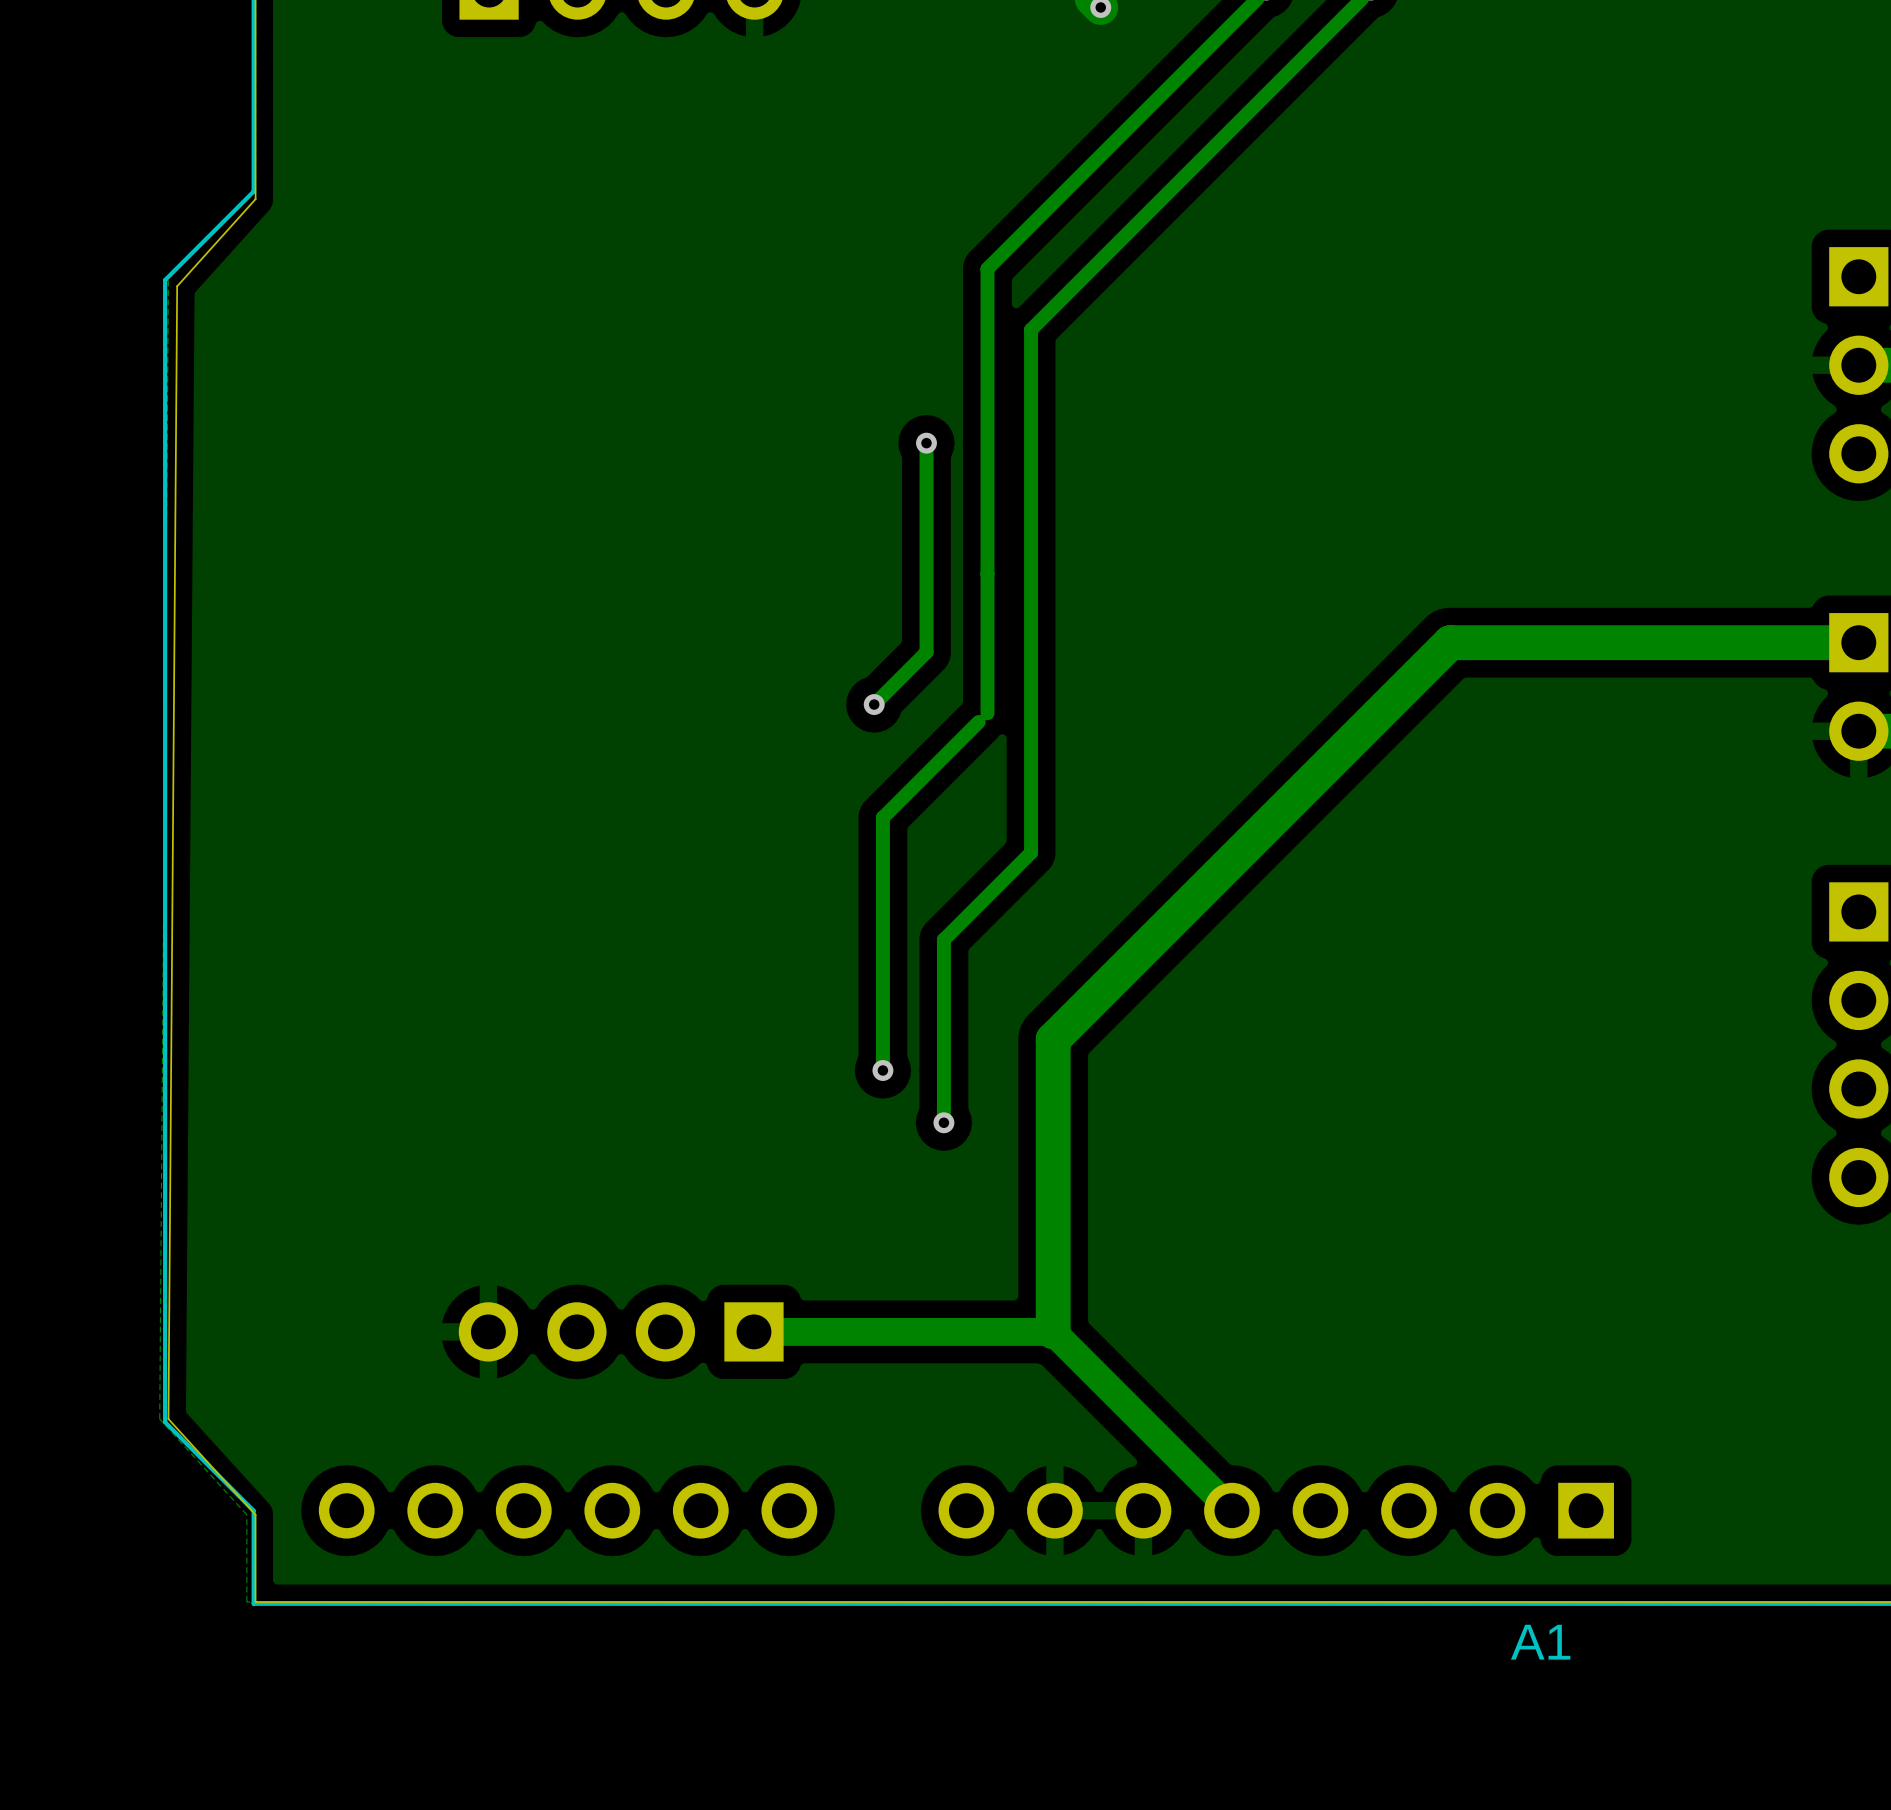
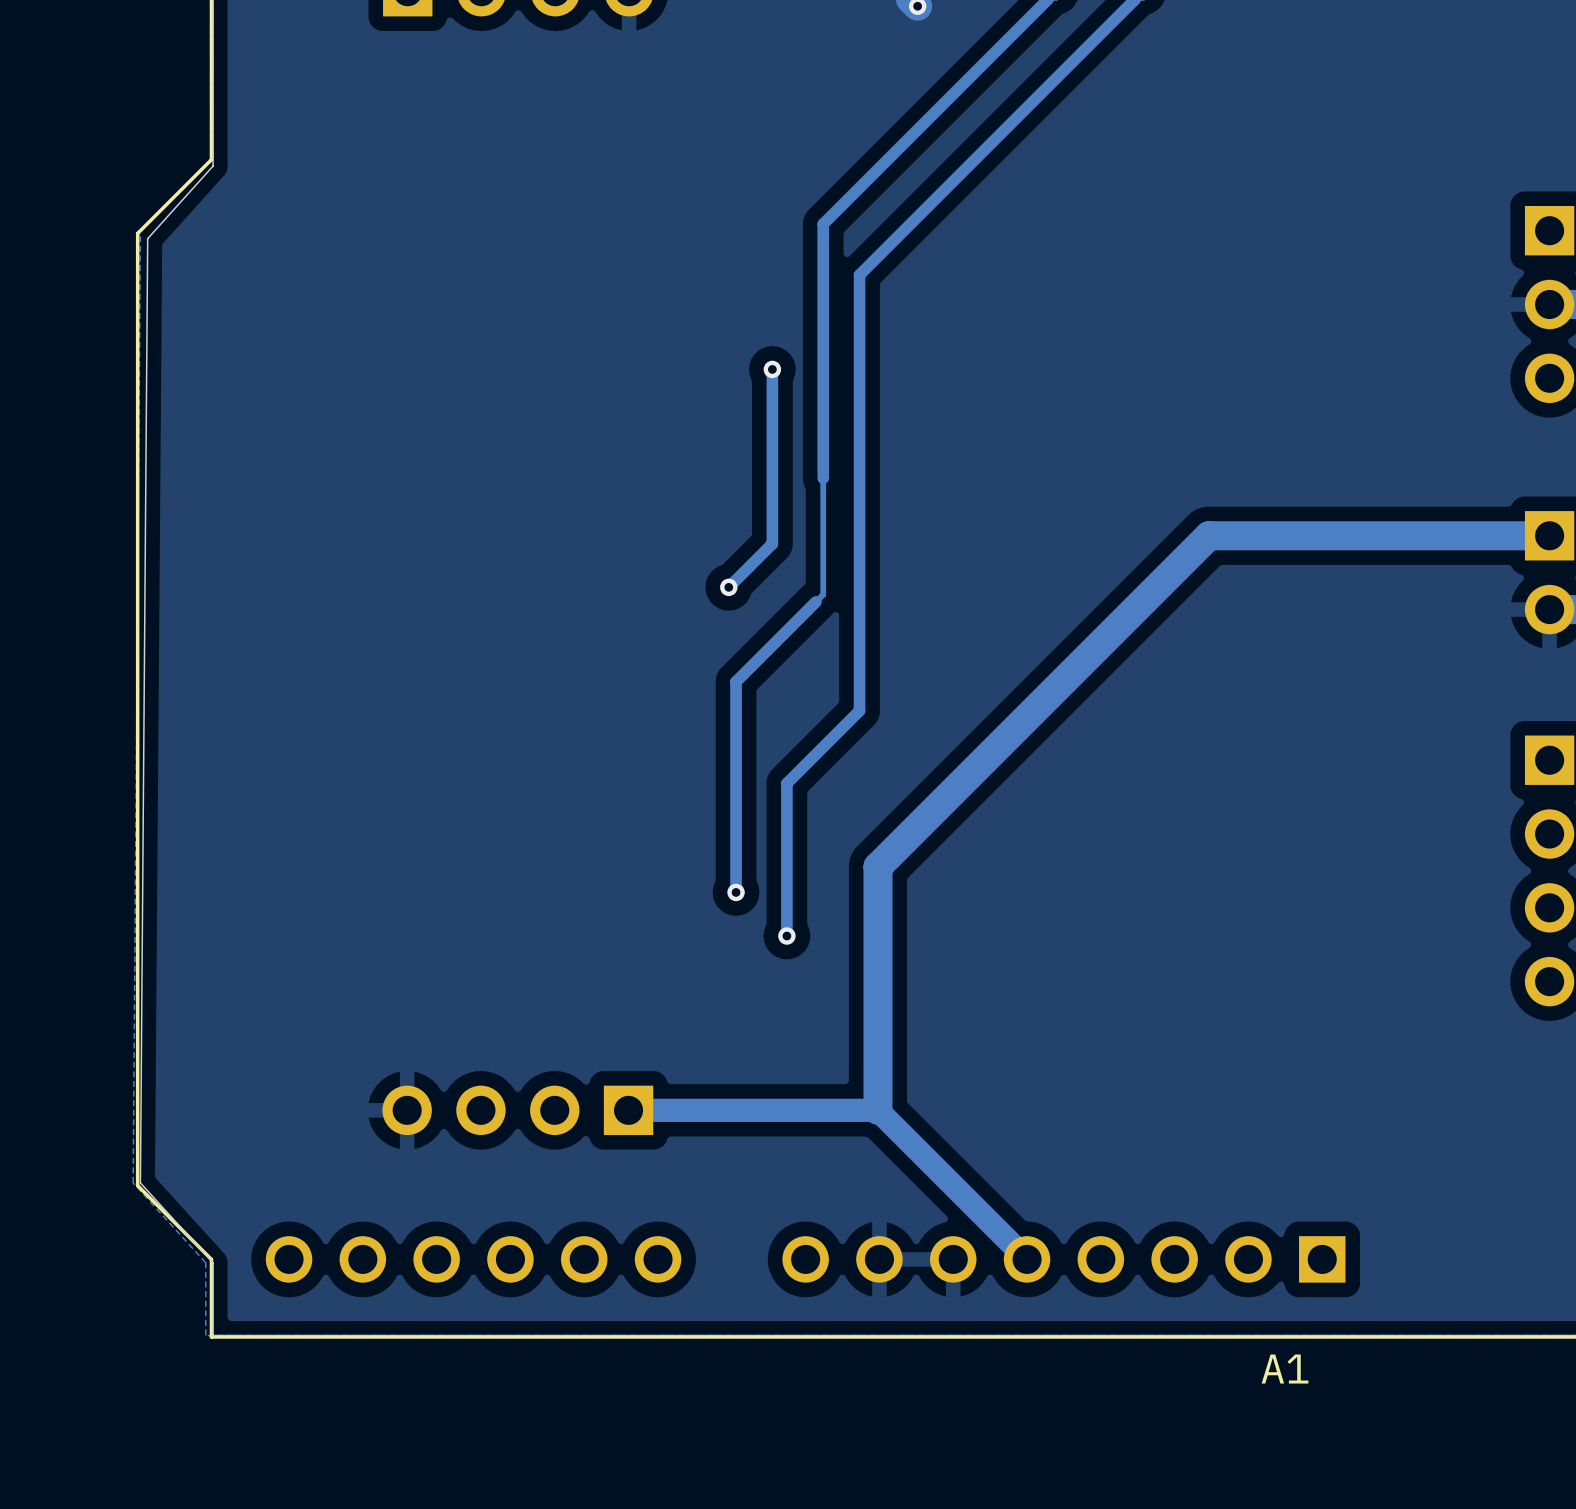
track width: thick (987, 573) (987, 713) -> thin (823, 478) (823, 594)

